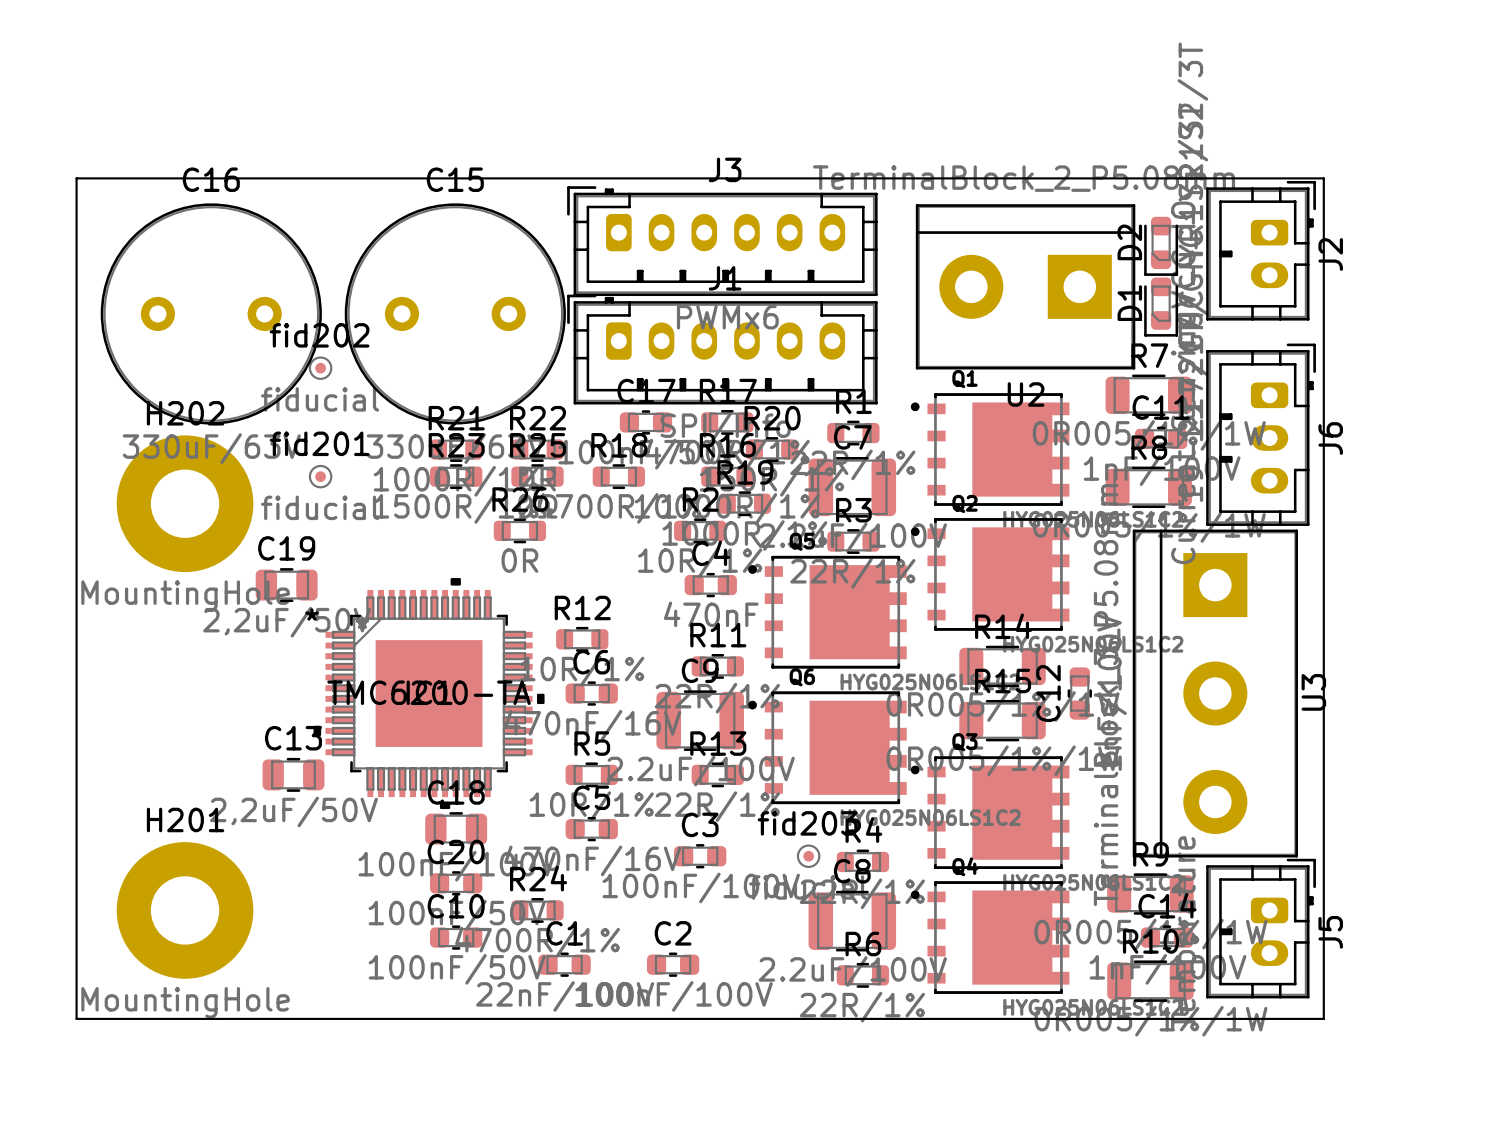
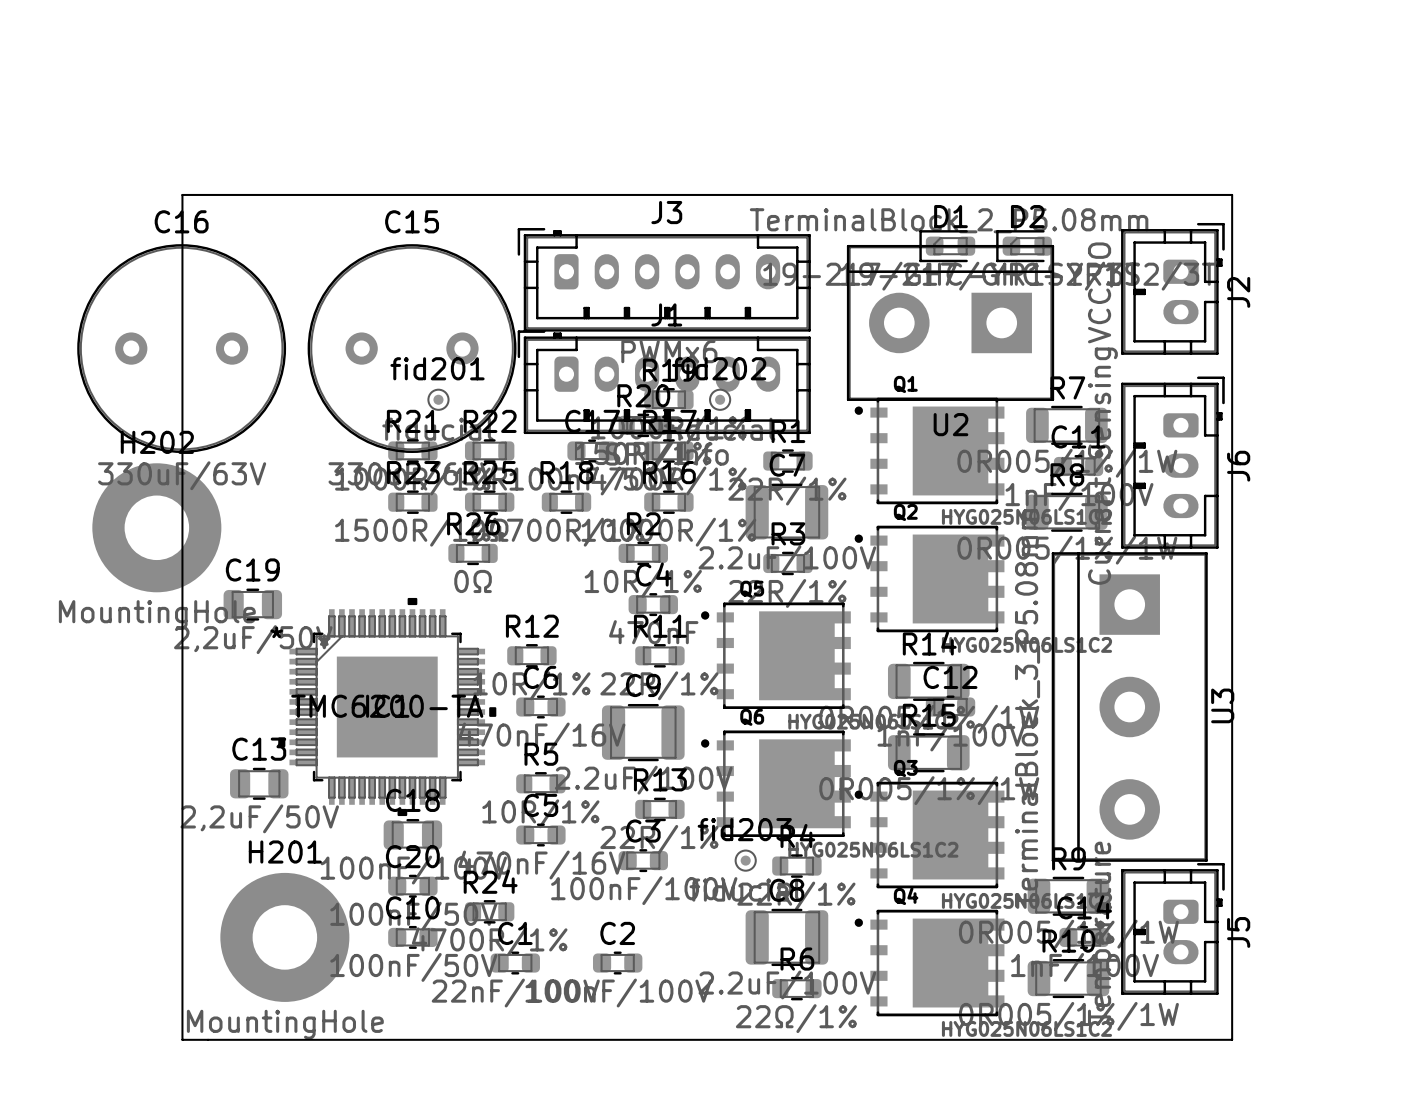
board edge: (1323, 178) (76, 178) (76, 1018) (1323, 1018) -> (1232, 220) (1232, 194) (182, 194) (182, 1039) (1232, 1039) (1232, 1014)
D2 rotation: 0° (1161, 246) -> 90° clockwise (1024, 246)
D2 position: (1161, 246) -> (1024, 246)
D1 rotation: 0° (1161, 307) -> 90° clockwise (947, 246)
D1 position: (1161, 307) -> (947, 246)
fid202 position: (320, 368) -> (720, 399)
R21 position: (456, 449) -> (412, 450)
R22 position: (537, 449) -> (489, 450)
R20 position: (772, 449) -> (643, 425)
Q1 position: (990, 449) -> (929, 450)
fid201 position: (320, 476) -> (438, 399)
R19 position: (744, 503) -> (668, 399)
R26 value: 0R (519, 560) -> 0Ω (473, 581)
Q2 position: (990, 574) -> (929, 578)
Q5 position: (827, 612) -> (775, 655)
R11 position: (717, 666) -> (659, 655)
C12 rotation: 0° (1079, 693) -> 90° clockwise (950, 707)
C12 position: (1079, 693) -> (950, 707)
R15 position: (1002, 720) -> (928, 752)
Q6 position: (827, 747) -> (775, 783)
R13 position: (717, 774) -> (659, 809)
Q3 position: (990, 812) -> (929, 835)
H201 position: (185, 910) -> (284, 937)
C8 position: (852, 921) -> (786, 937)
Q4 position: (990, 937) -> (929, 963)
R6 position: (862, 975) -> (796, 988)
R6 value: 22R/1% (862, 1007) -> 22Ω/1% (796, 1018)

